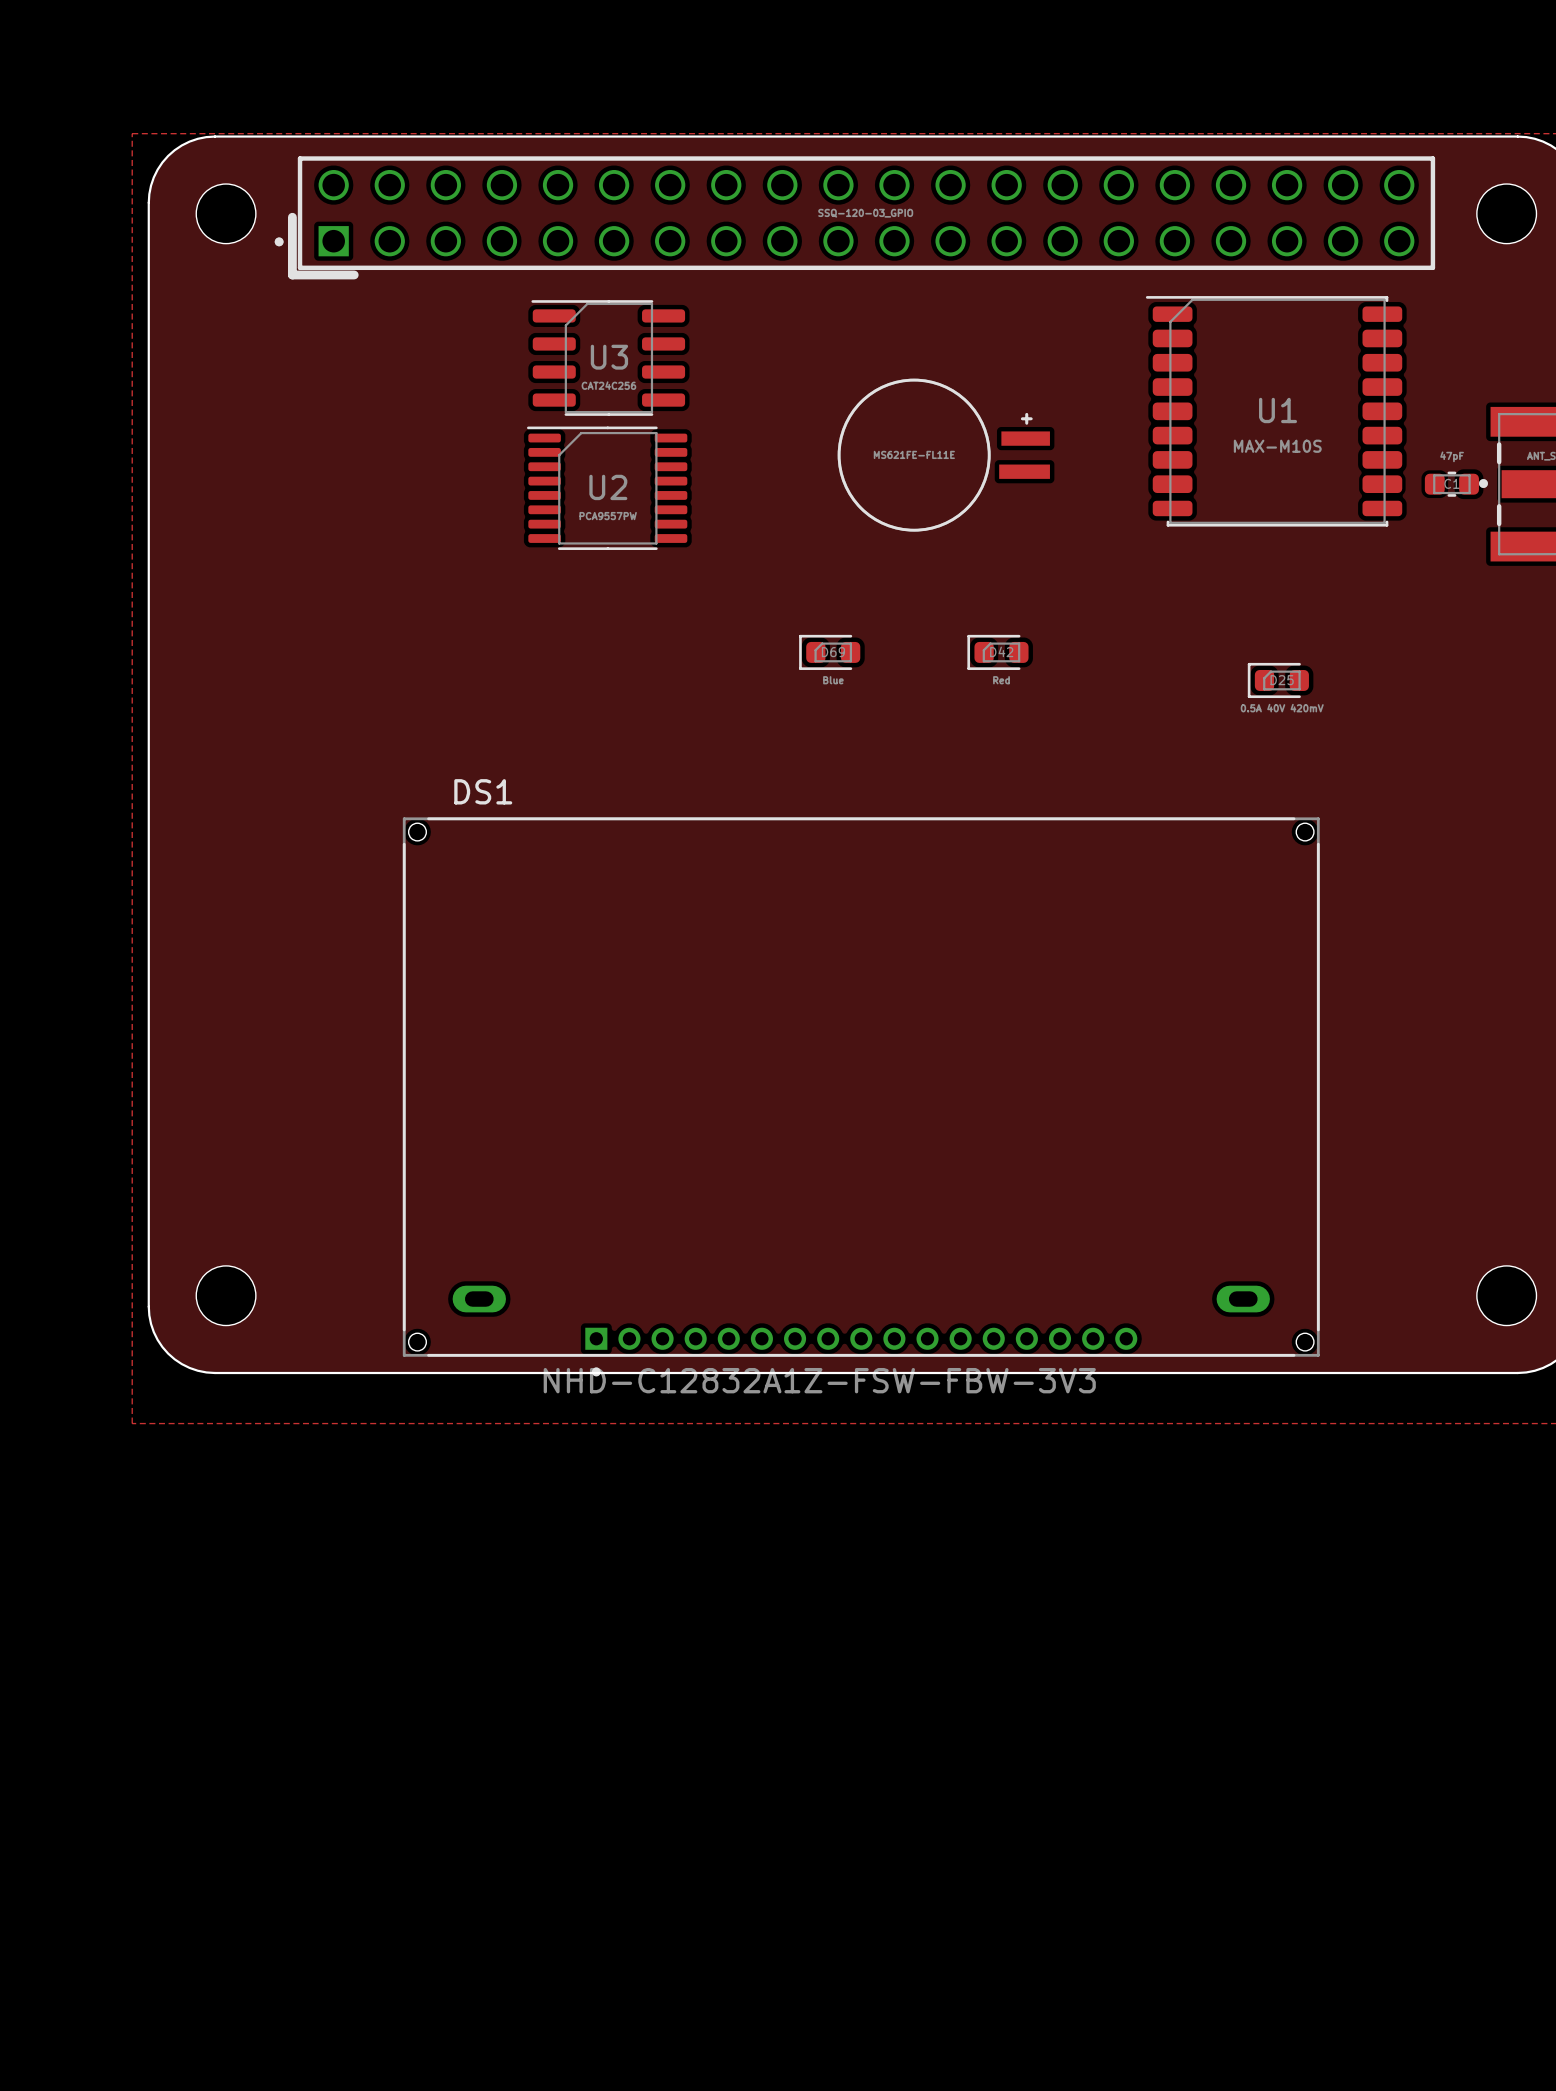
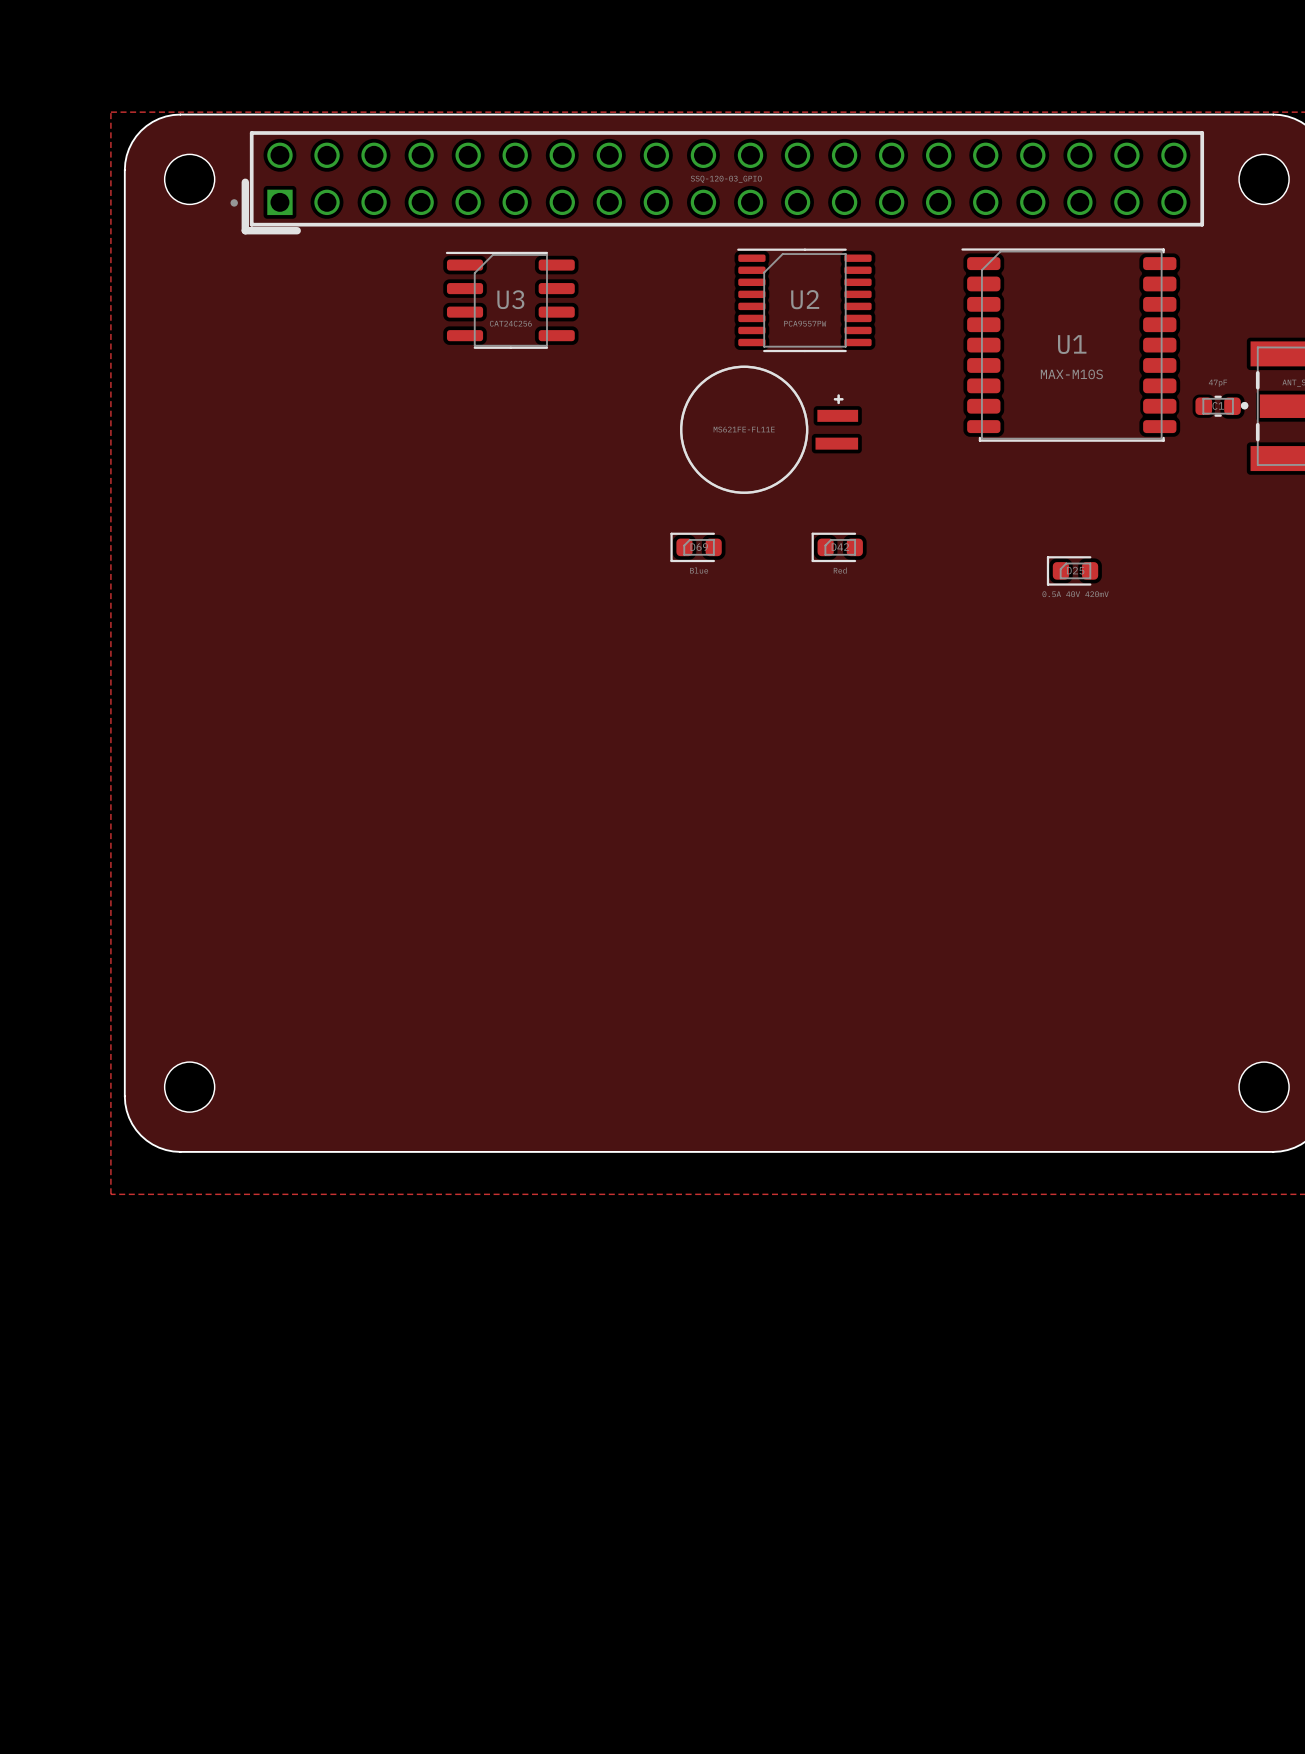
part footprint: [274, 156, 1436, 280] -> [230, 131, 1205, 235]
part position: (943, 455) -> (769, 429)
U2 position: (607, 488) -> (804, 300)
DS1: NHD-C12832A1Z-FSW-FBW-3V3 (861, 1096) -> none

